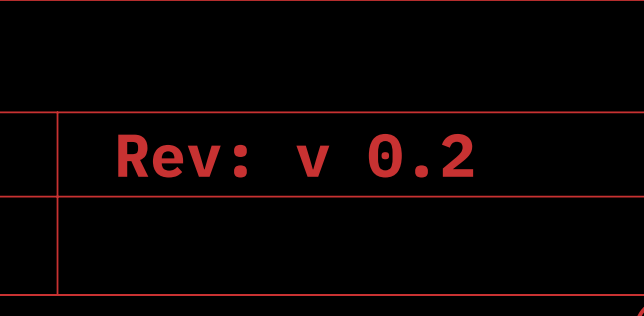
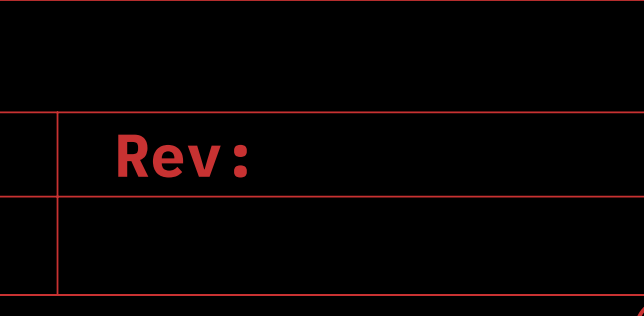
title block: Rev: v 0.2 (295, 155) -> Rev: (182, 156)

